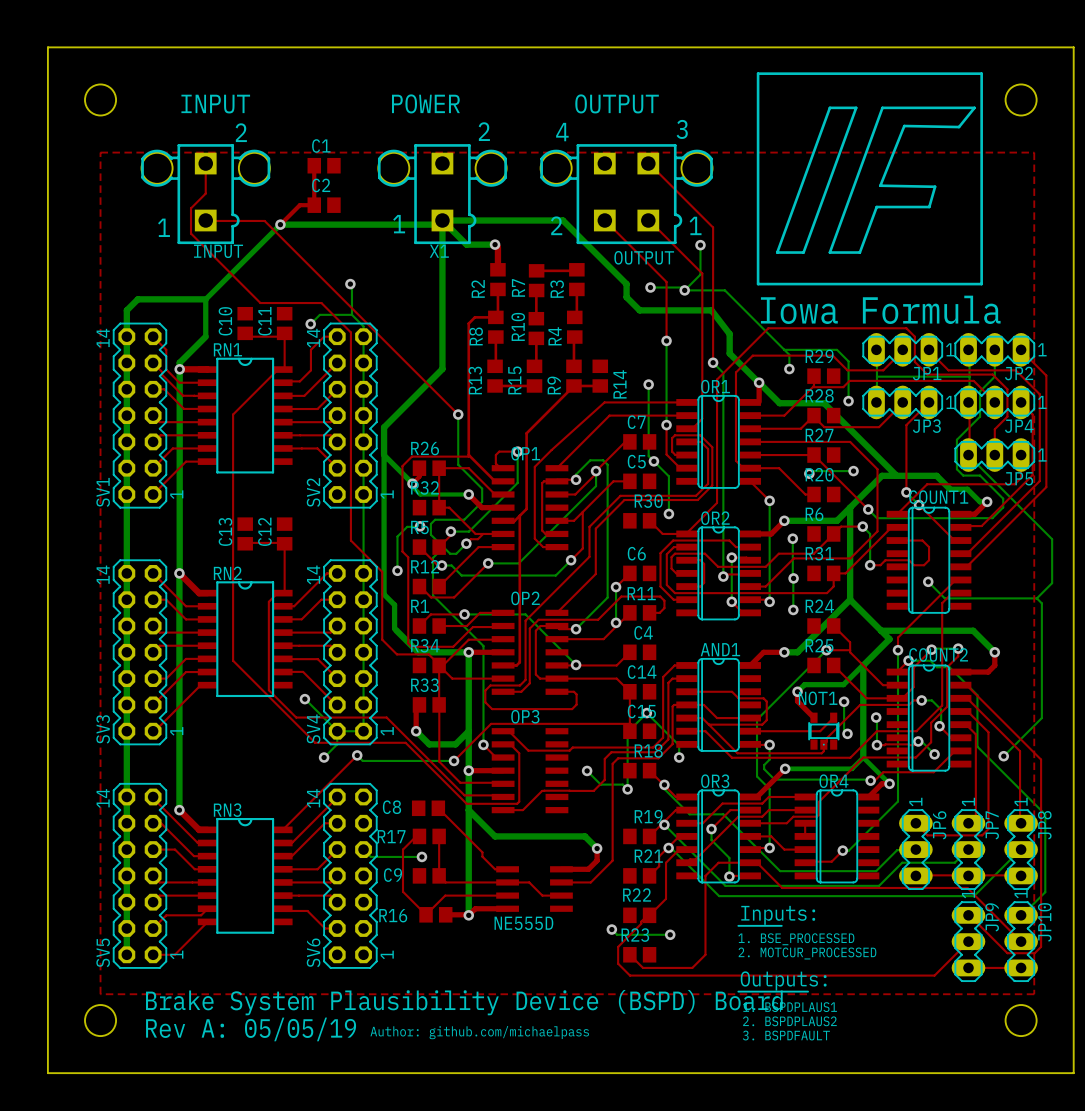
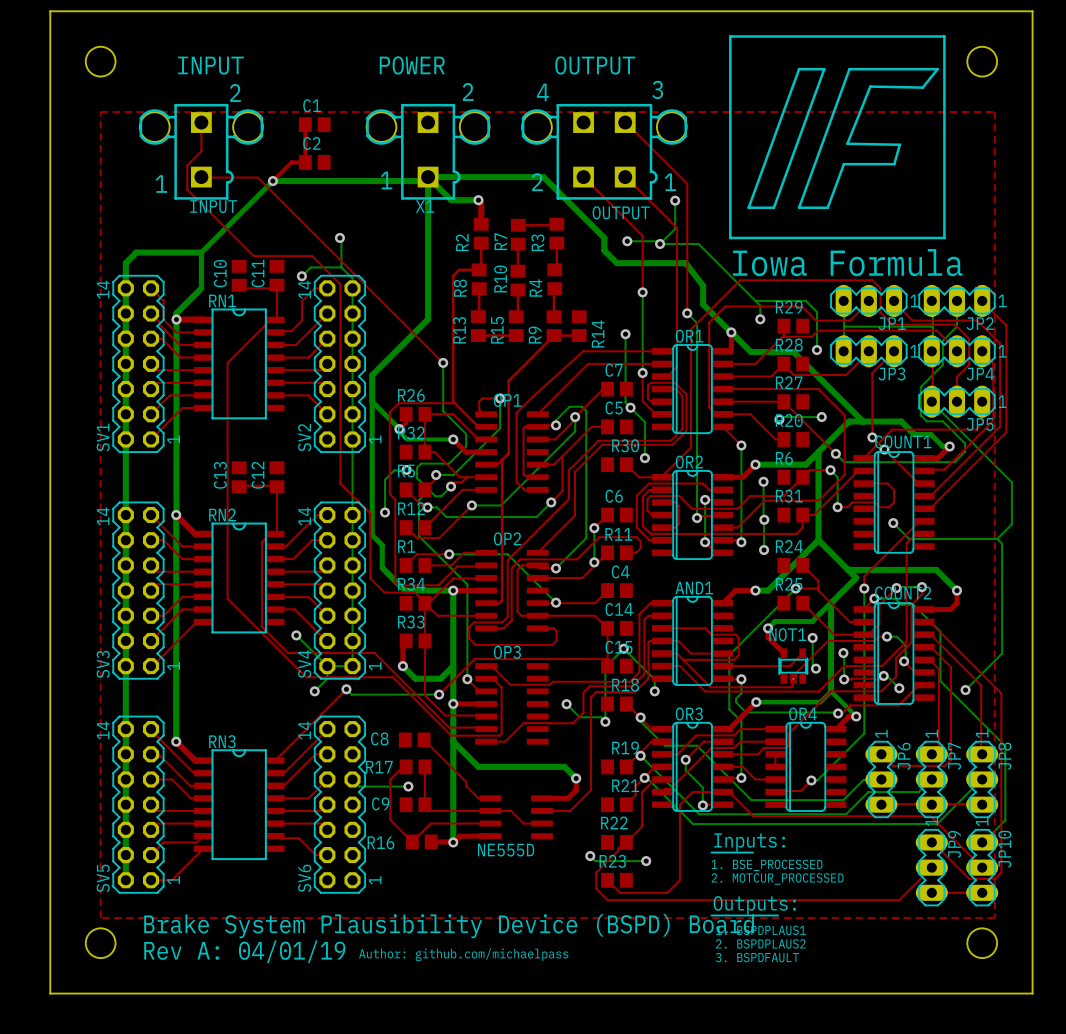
text: Rev A: 05/05/19 (251, 1029) -> Rev A: 04/01/19 (244, 951)

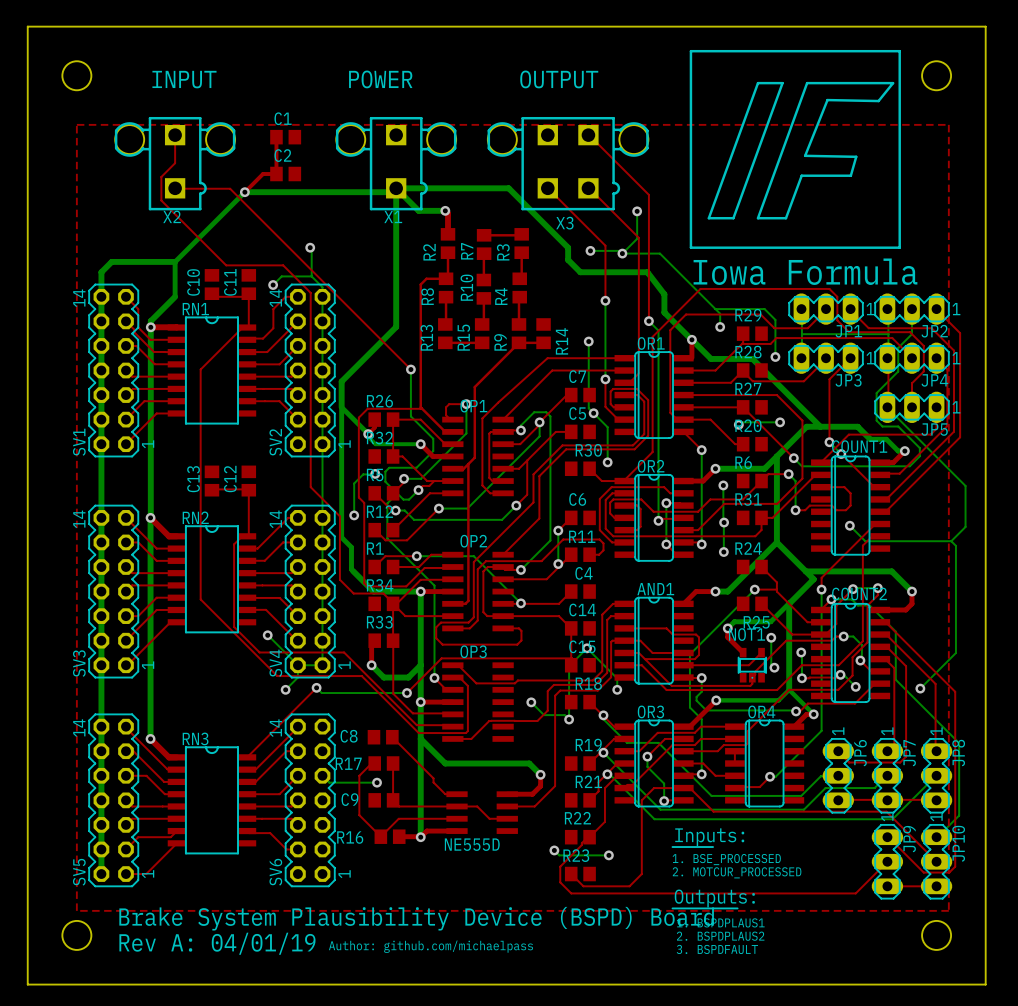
text: 3 (657, 89) -> none
text: 2 (468, 91) -> none
text: 2 (235, 92) -> none
text: 4 (542, 92) -> none
text: 1 (386, 180) -> none
text: 2 (537, 182) -> none
text: 1 (670, 182) -> none
text: 1 (161, 184) -> none
INPUT name: INPUT (213, 206) -> X2 (172, 216)
OUTPUT name: OUTPUT (621, 212) -> X3 (564, 223)
R25 name position: R25 (789, 584) -> R25 (756, 622)

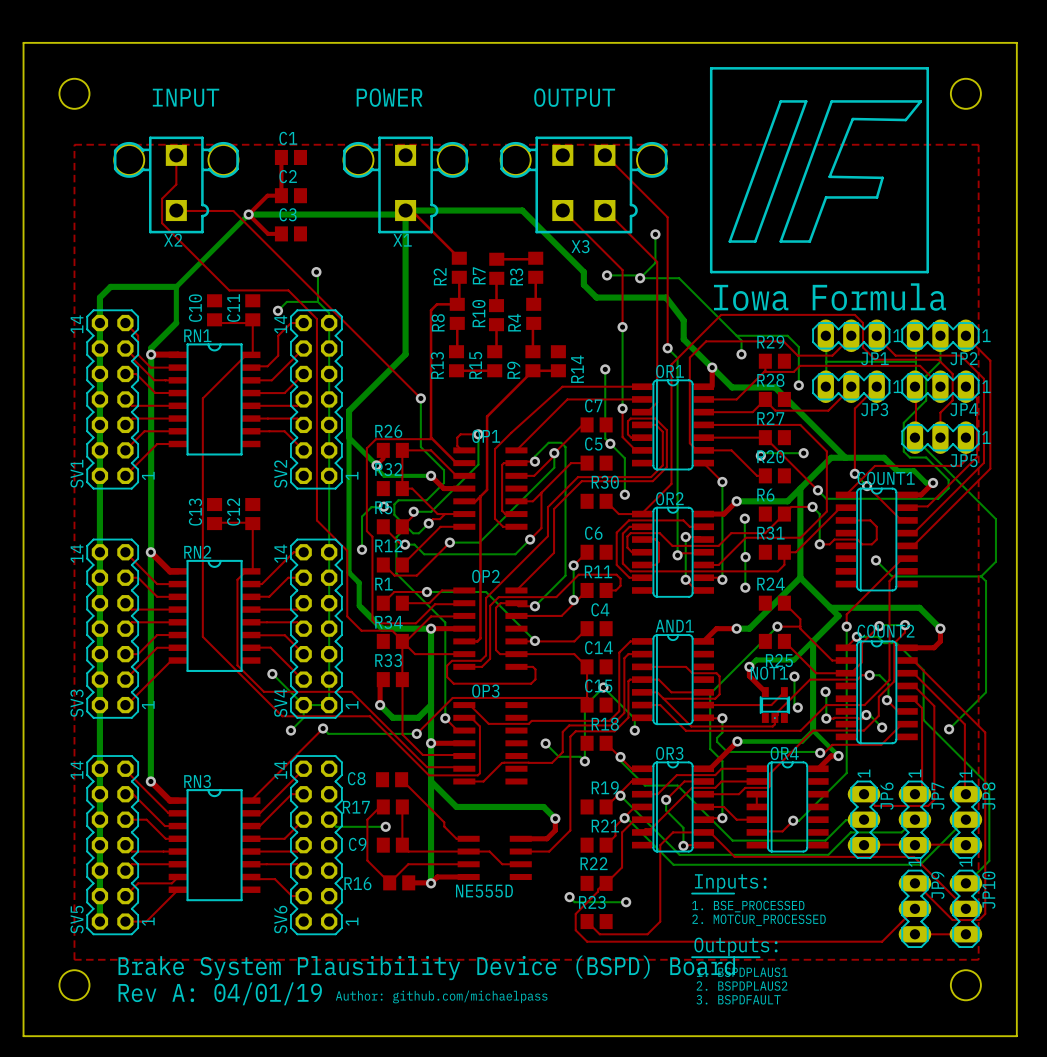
bottom track: (396, 188) (418, 210) (445, 210) -> none
top track: none -> (248, 214) (268, 233) (281, 233)
C3: none -> (290, 233)
top track: (445, 210) (448, 213) (448, 234) -> (405, 210) (411, 210) (459, 258)
via: (445, 210) -> none

